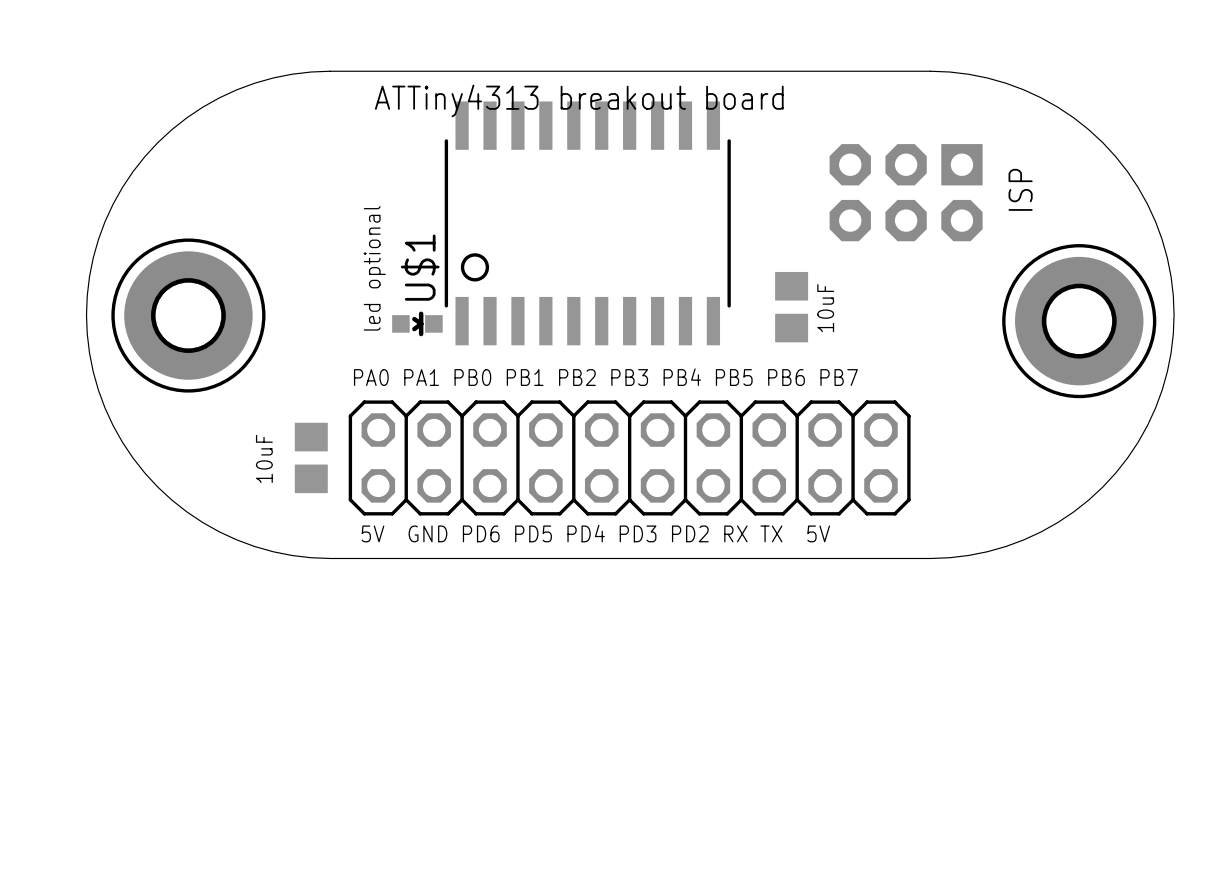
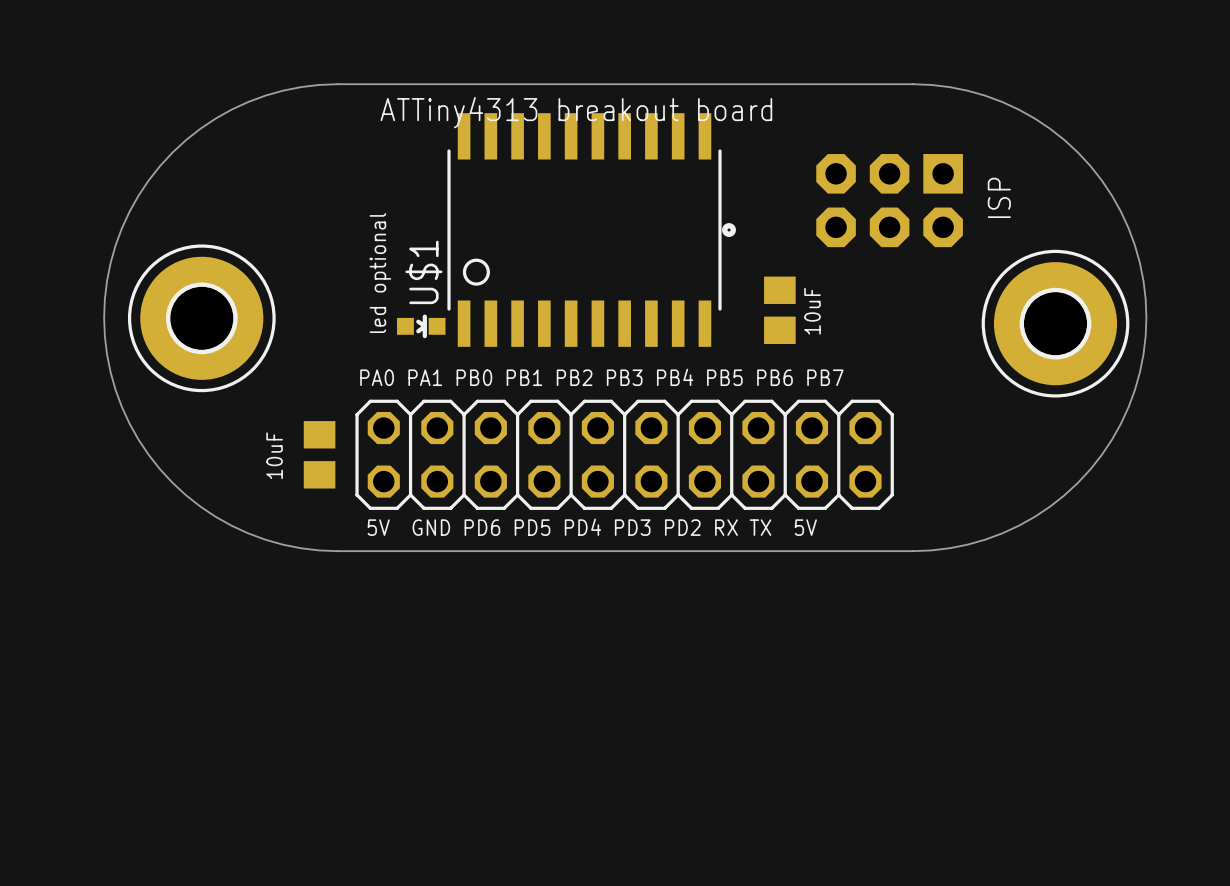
drawing: none -> [722, 223, 736, 237]

